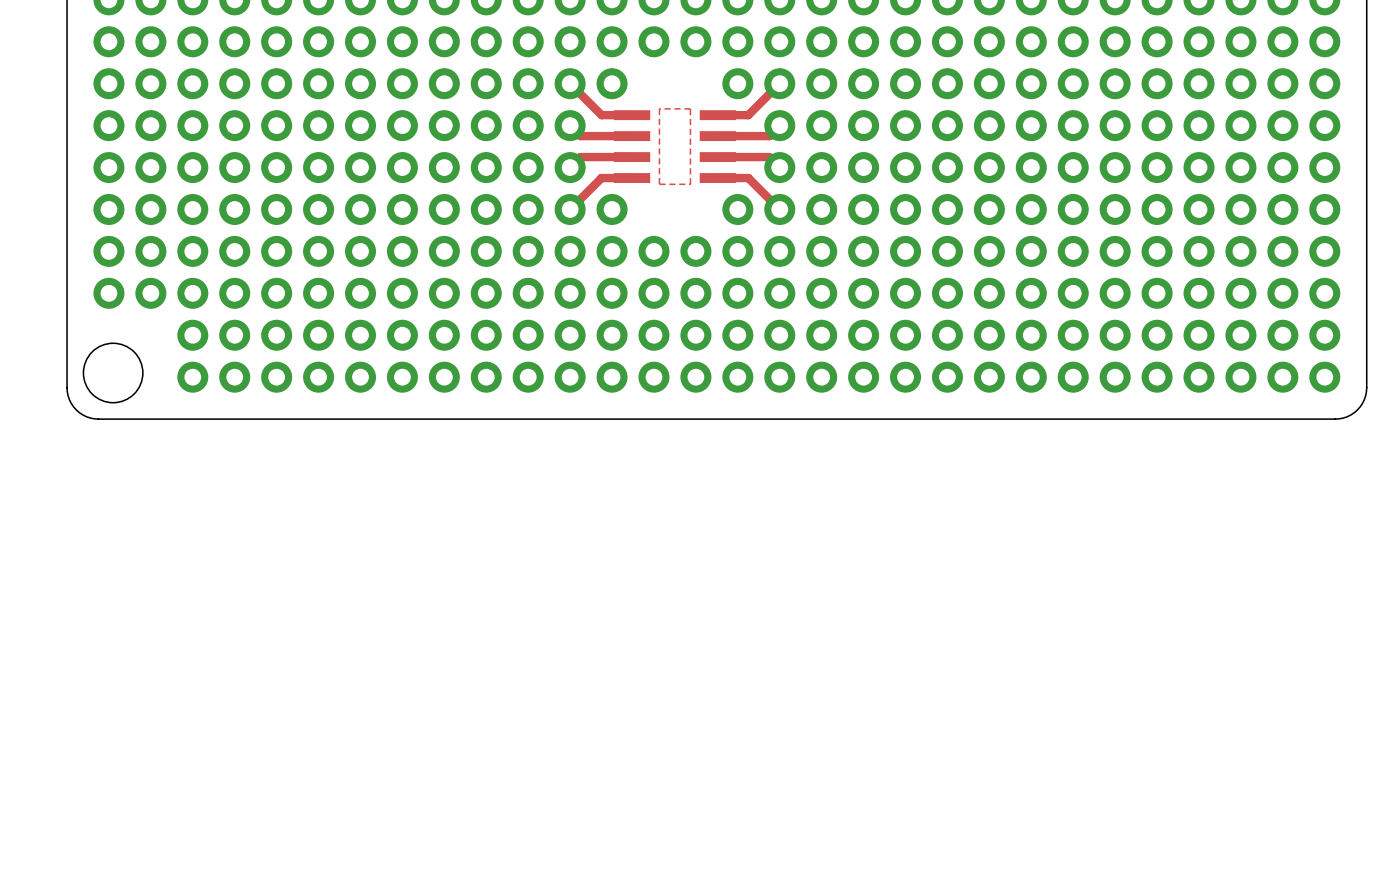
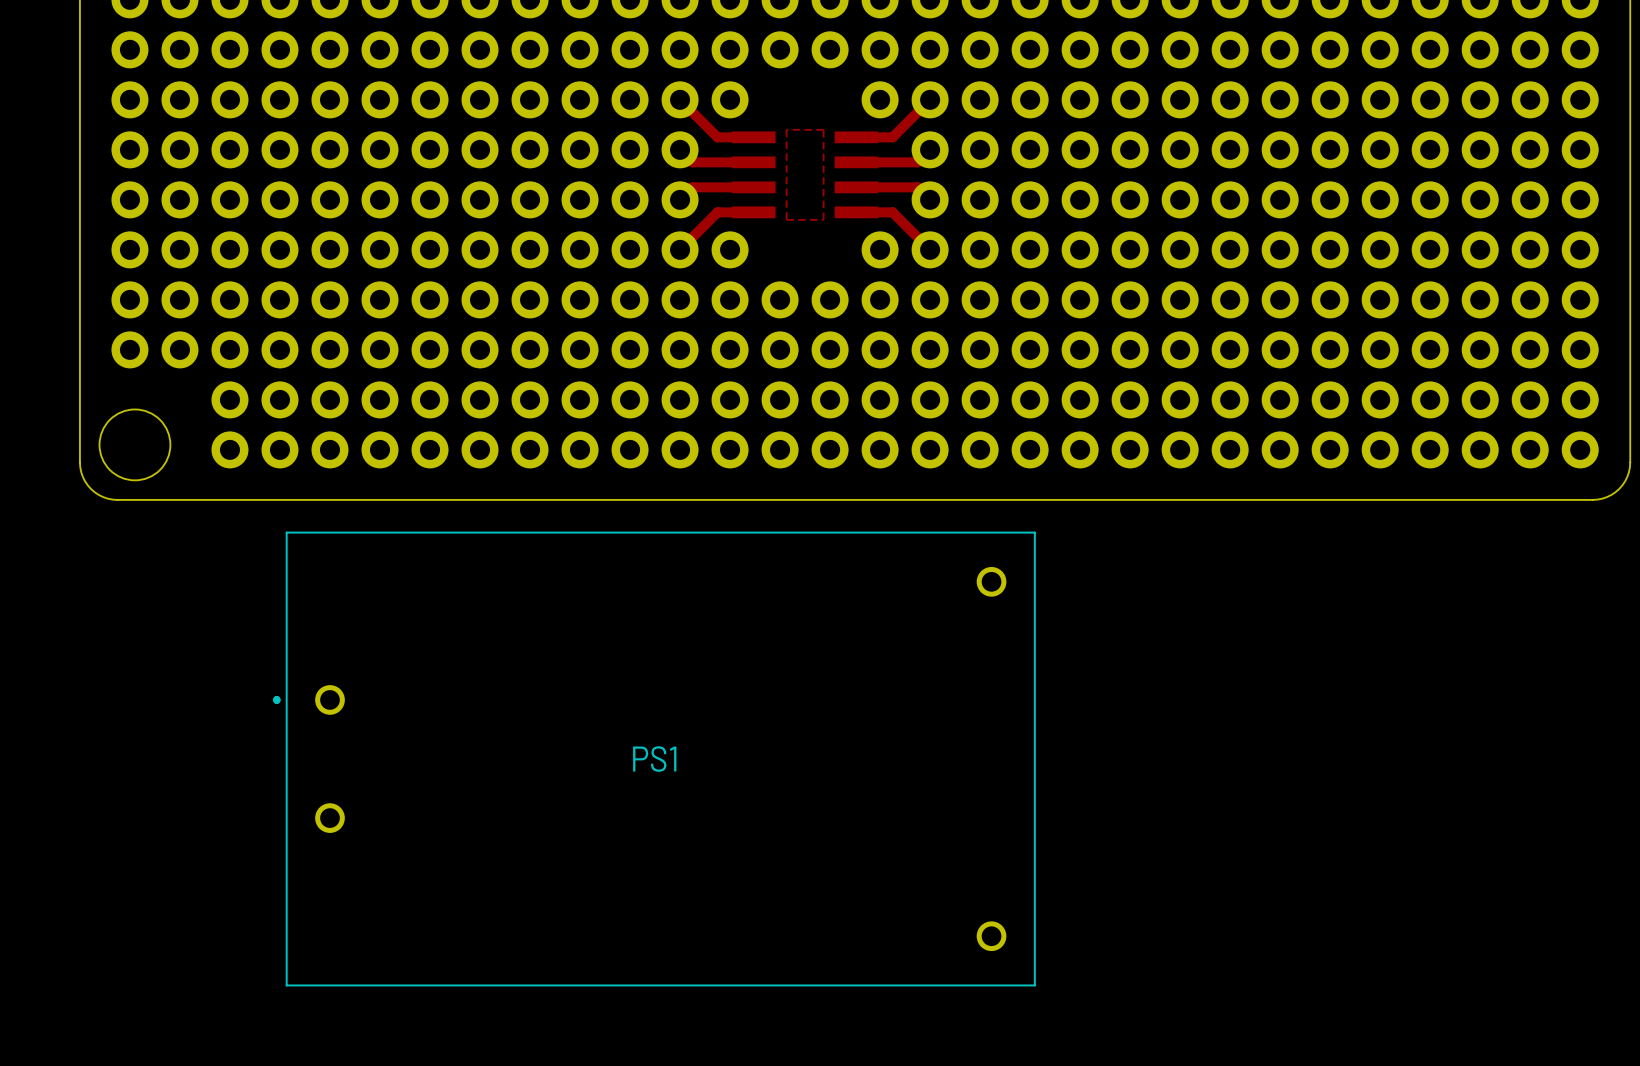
PS1: none -> (654, 759)

